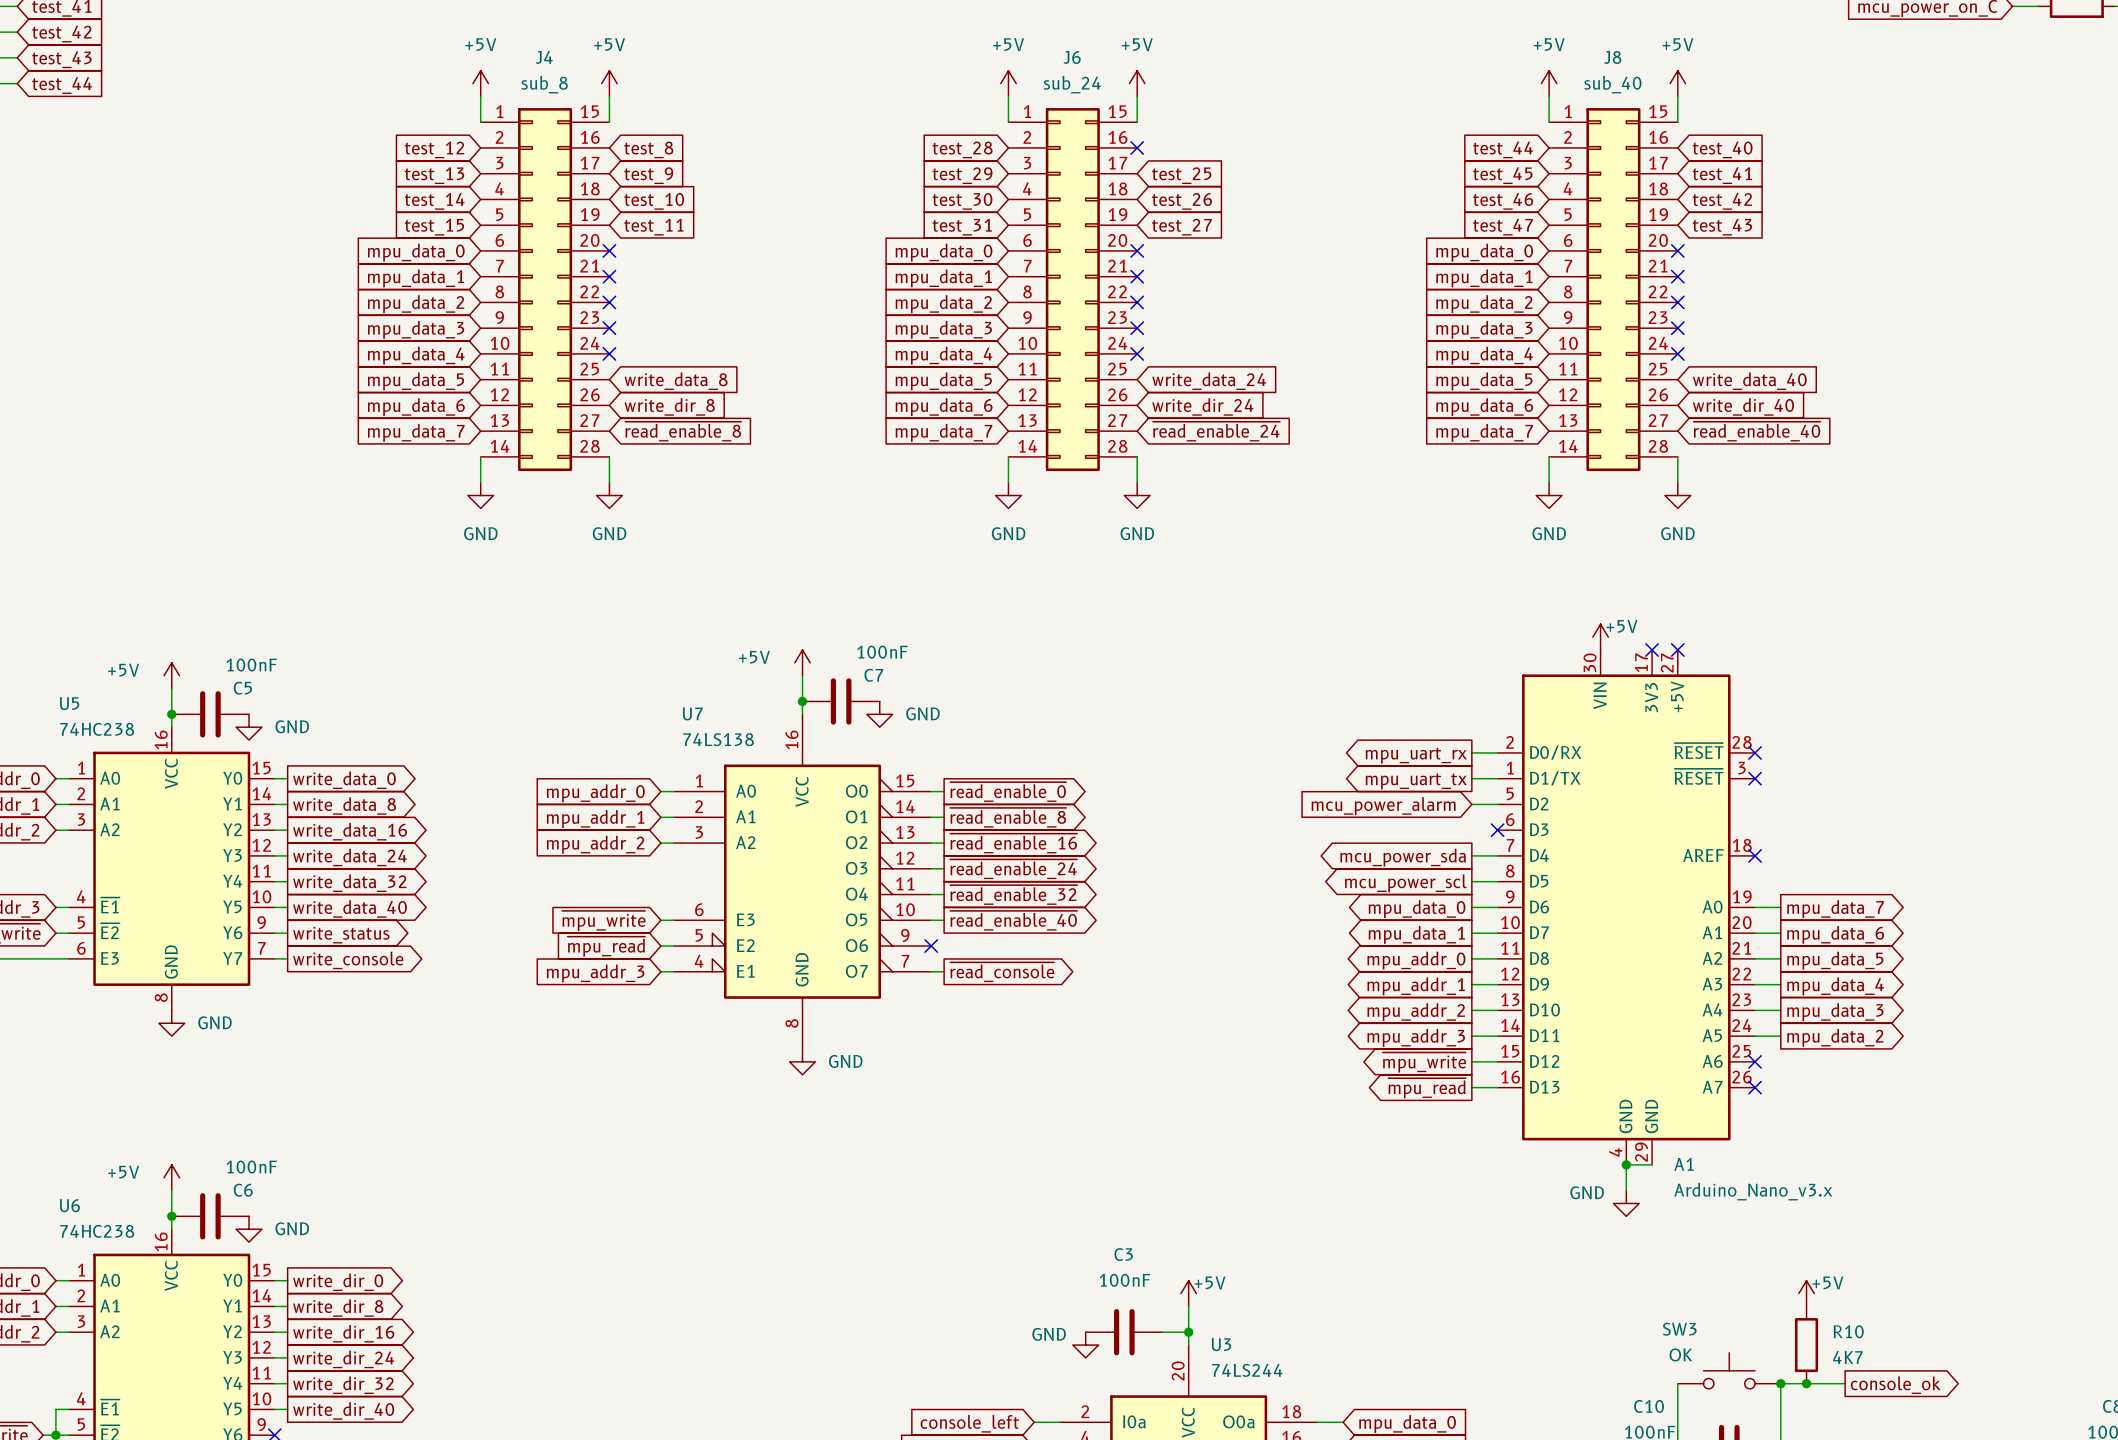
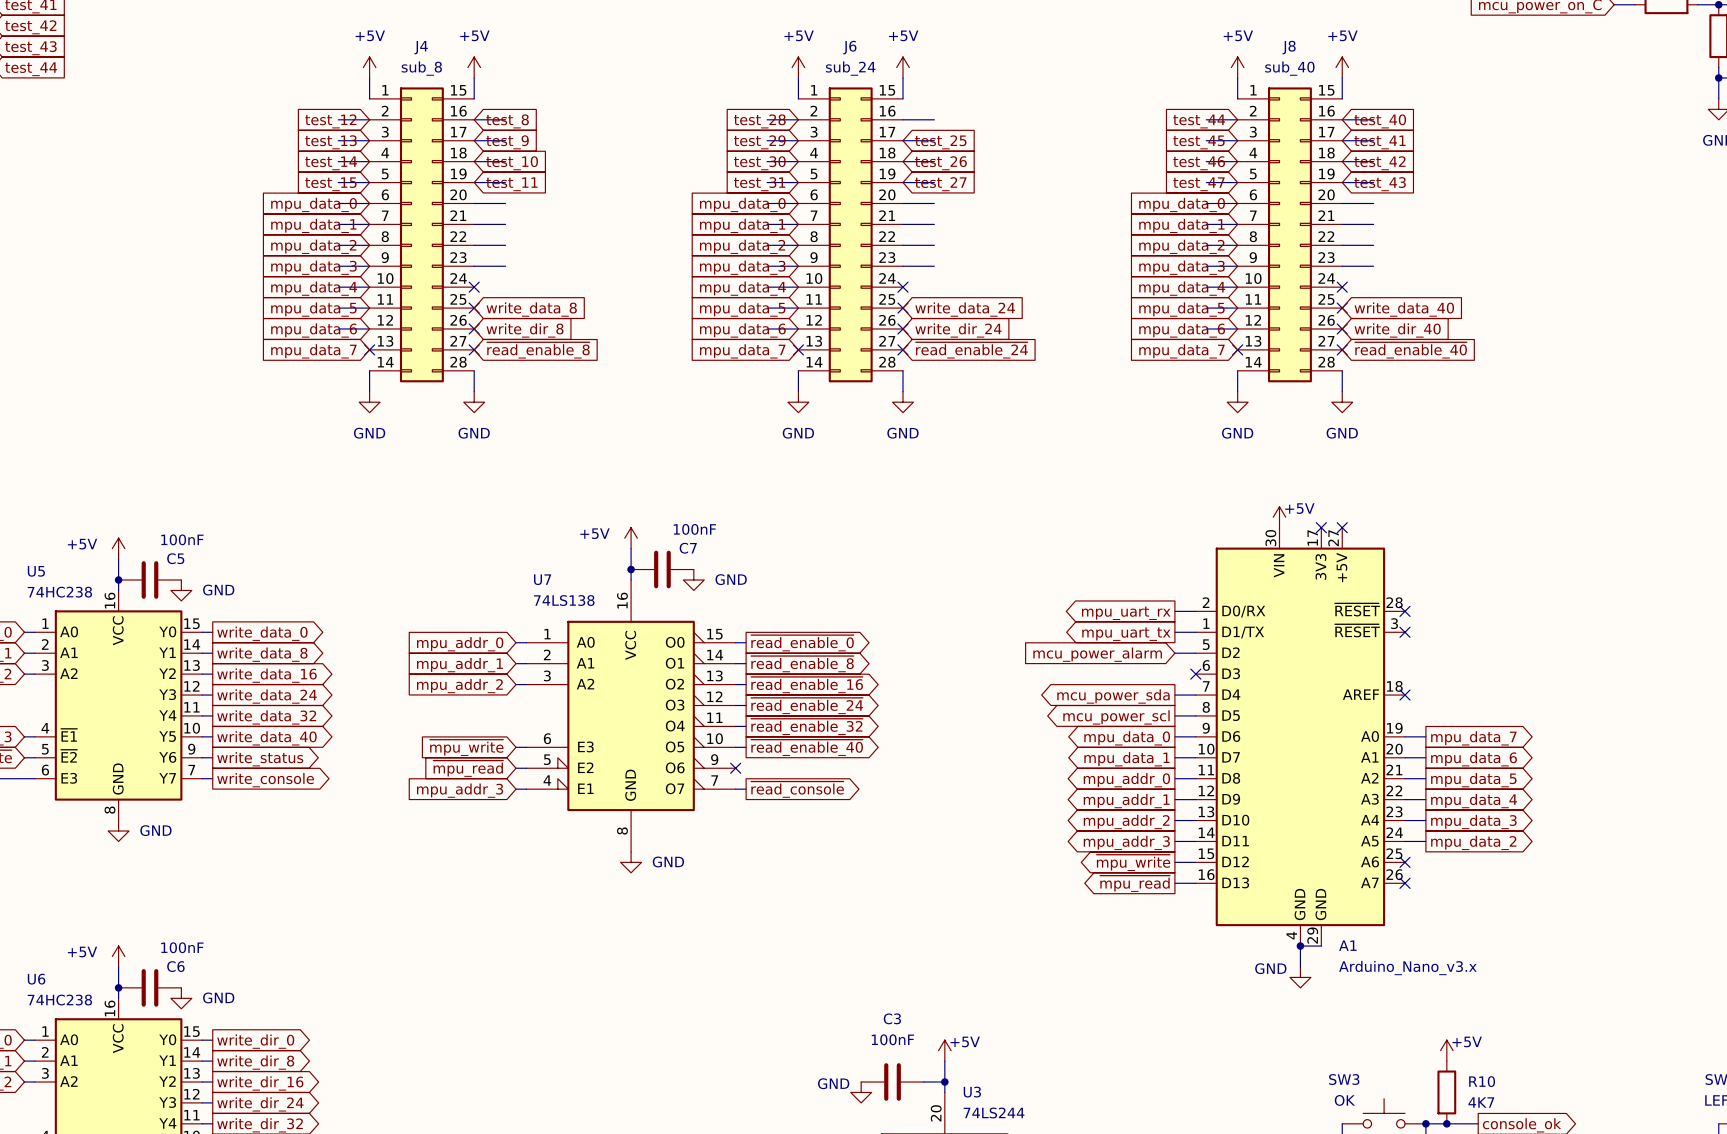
wire: none -> (338, 119) (369, 119)
wire: none -> (474, 119) (505, 119)
wire: none -> (767, 119) (798, 119)
wire: none -> (902, 119) (934, 119)
no-connect mark: (1137, 147) -> none
wire: none -> (1206, 119) (1237, 119)
wire: none -> (1342, 119) (1373, 119)
wire: none -> (338, 140) (369, 140)
wire: none -> (474, 140) (505, 140)
wire: none -> (767, 140) (798, 140)
wire: none -> (902, 140) (934, 140)
wire: none -> (1206, 140) (1237, 140)
wire: none -> (1342, 140) (1373, 140)
wire: none -> (338, 161) (369, 161)
wire: none -> (474, 161) (505, 161)
wire: none -> (767, 161) (798, 161)
wire: none -> (902, 161) (934, 161)
wire: none -> (1206, 161) (1237, 161)
wire: none -> (1342, 161) (1373, 161)
wire: none -> (338, 182) (369, 182)
wire: none -> (474, 182) (505, 182)
wire: none -> (767, 182) (798, 182)
wire: none -> (902, 182) (934, 182)
wire: none -> (1206, 182) (1237, 182)
wire: none -> (1342, 182) (1373, 182)
wire: none -> (338, 203) (369, 203)
wire: none -> (474, 203) (505, 203)
no-connect mark: (609, 250) -> none
wire: none -> (767, 203) (798, 203)
wire: none -> (902, 203) (934, 203)
no-connect mark: (1137, 250) -> none
wire: none -> (1206, 203) (1237, 203)
wire: none -> (1342, 203) (1373, 203)
no-connect mark: (1677, 250) -> none
wire: none -> (338, 224) (369, 224)
wire: none -> (474, 224) (505, 224)
no-connect mark: (609, 276) -> none
wire: none -> (767, 224) (798, 224)
wire: none -> (902, 224) (934, 224)
no-connect mark: (1137, 276) -> none
wire: none -> (1206, 224) (1237, 224)
wire: none -> (1342, 224) (1373, 224)
no-connect mark: (1677, 276) -> none
wire: none -> (338, 245) (369, 245)
wire: none -> (474, 245) (505, 245)
no-connect mark: (609, 302) -> none
wire: none -> (767, 245) (798, 245)
wire: none -> (902, 245) (934, 245)
no-connect mark: (1137, 302) -> none
wire: none -> (1206, 245) (1237, 245)
wire: none -> (1342, 245) (1373, 245)
no-connect mark: (1677, 302) -> none
wire: none -> (338, 266) (369, 266)
wire: none -> (474, 266) (505, 266)
no-connect mark: (609, 328) -> none
wire: none -> (767, 266) (798, 266)
wire: none -> (902, 266) (934, 266)
no-connect mark: (1137, 328) -> none
wire: none -> (1206, 266) (1237, 266)
wire: none -> (1342, 266) (1373, 266)
no-connect mark: (1677, 328) -> none
wire: none -> (338, 287) (369, 287)
wire: none -> (767, 287) (798, 287)
wire: none -> (1206, 287) (1237, 287)
wire: none -> (338, 308) (369, 308)
no-connect mark: none -> (474, 308)
wire: none -> (767, 308) (798, 308)
no-connect mark: none -> (902, 308)
wire: none -> (1206, 308) (1237, 308)
no-connect mark: none -> (1342, 308)
wire: none -> (338, 328) (369, 328)
no-connect mark: none -> (474, 328)
wire: none -> (767, 328) (798, 328)
no-connect mark: none -> (902, 328)
wire: none -> (1206, 328) (1237, 328)
no-connect mark: none -> (1342, 328)
no-connect mark: none -> (369, 349)
no-connect mark: none -> (474, 349)
no-connect mark: none -> (798, 349)
no-connect mark: none -> (902, 349)
no-connect mark: none -> (1237, 349)
no-connect mark: none -> (1342, 349)

